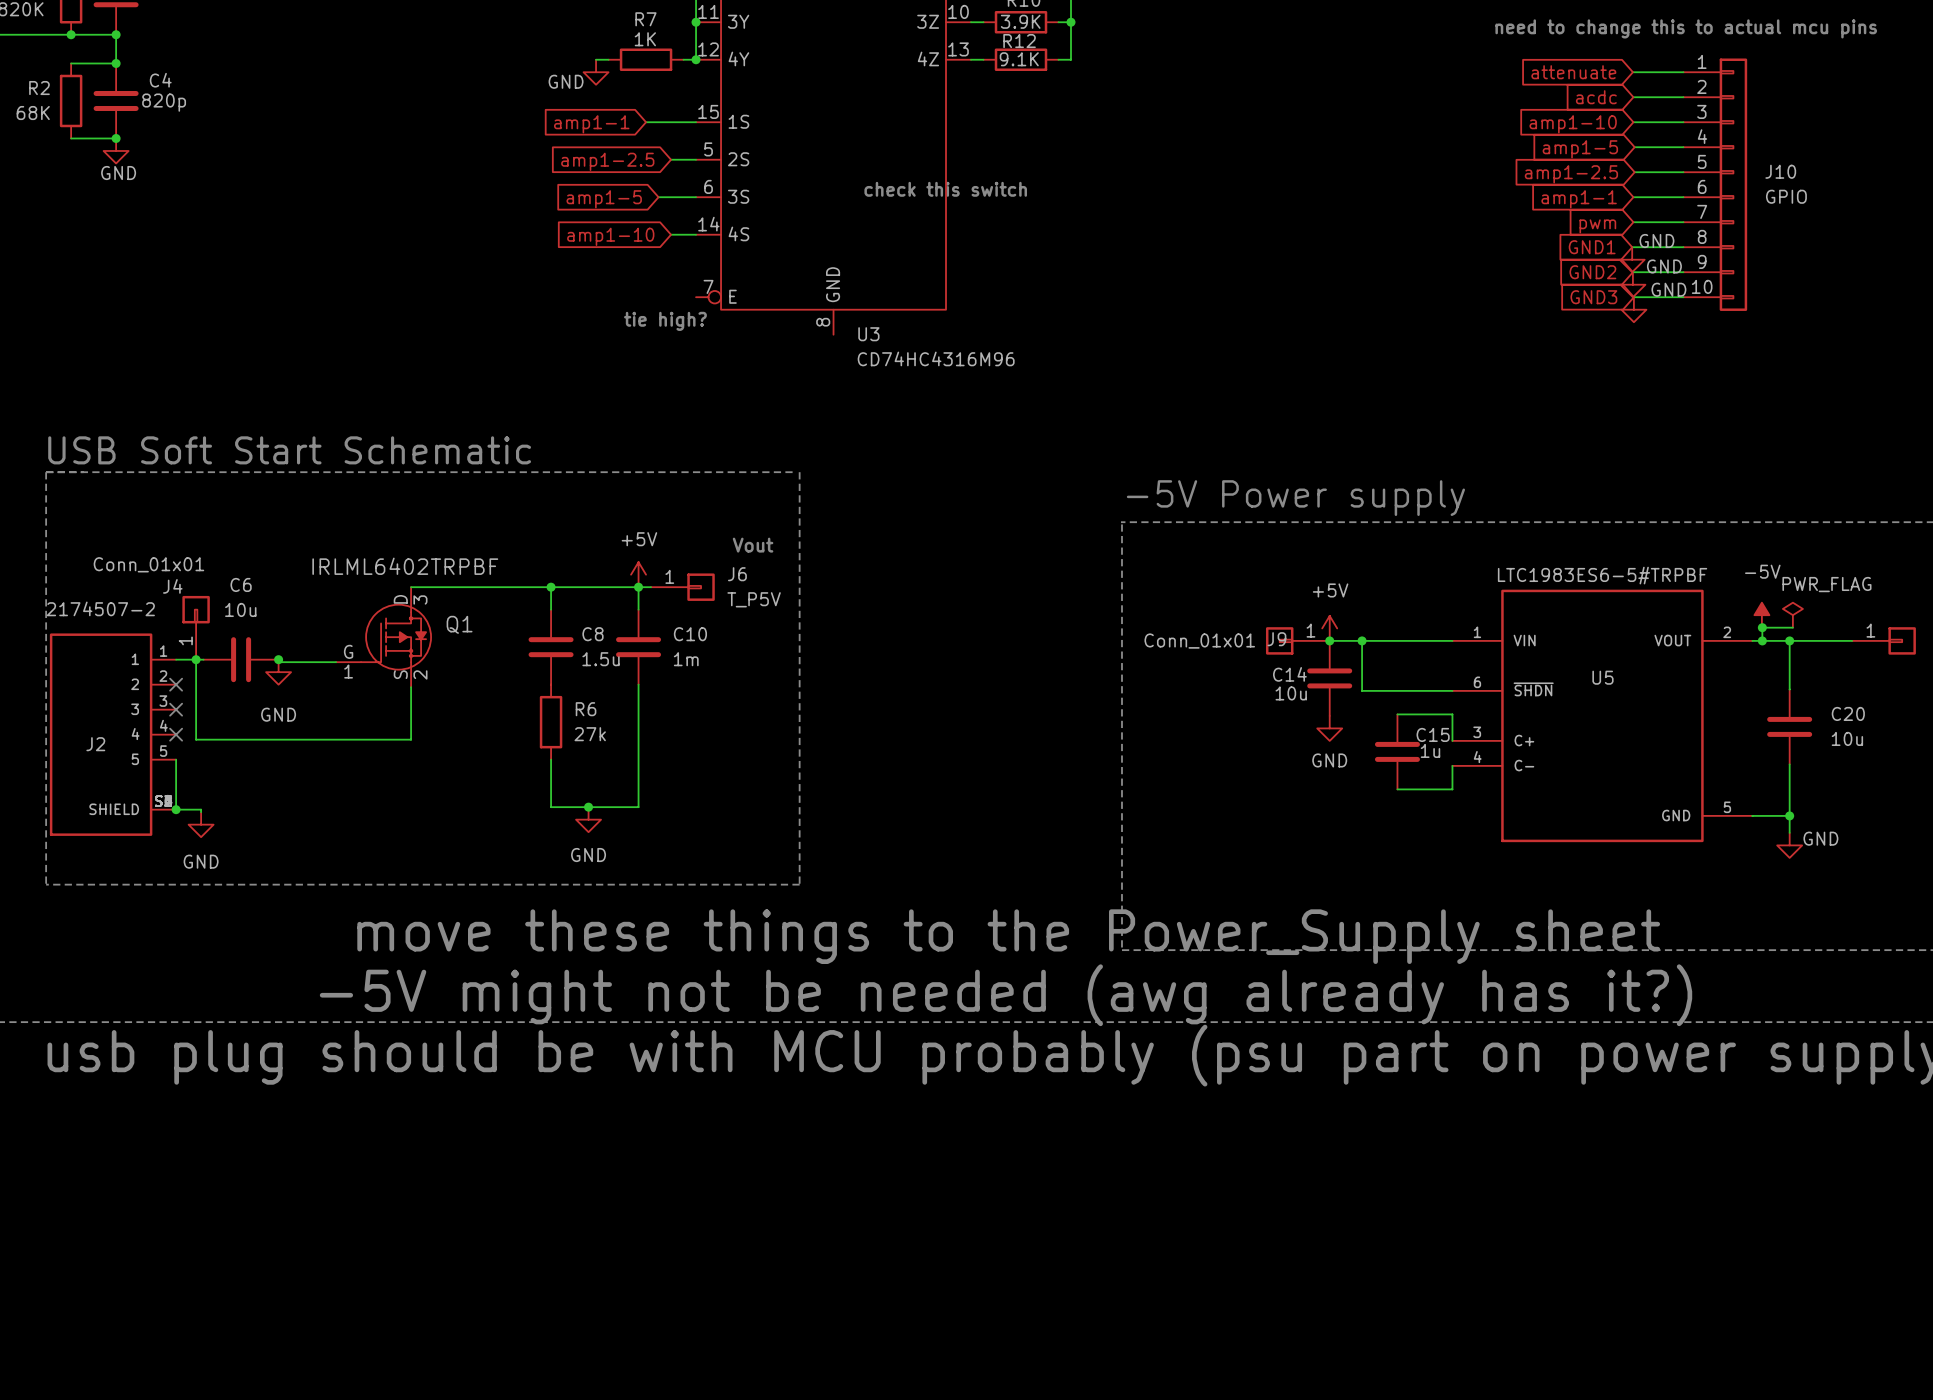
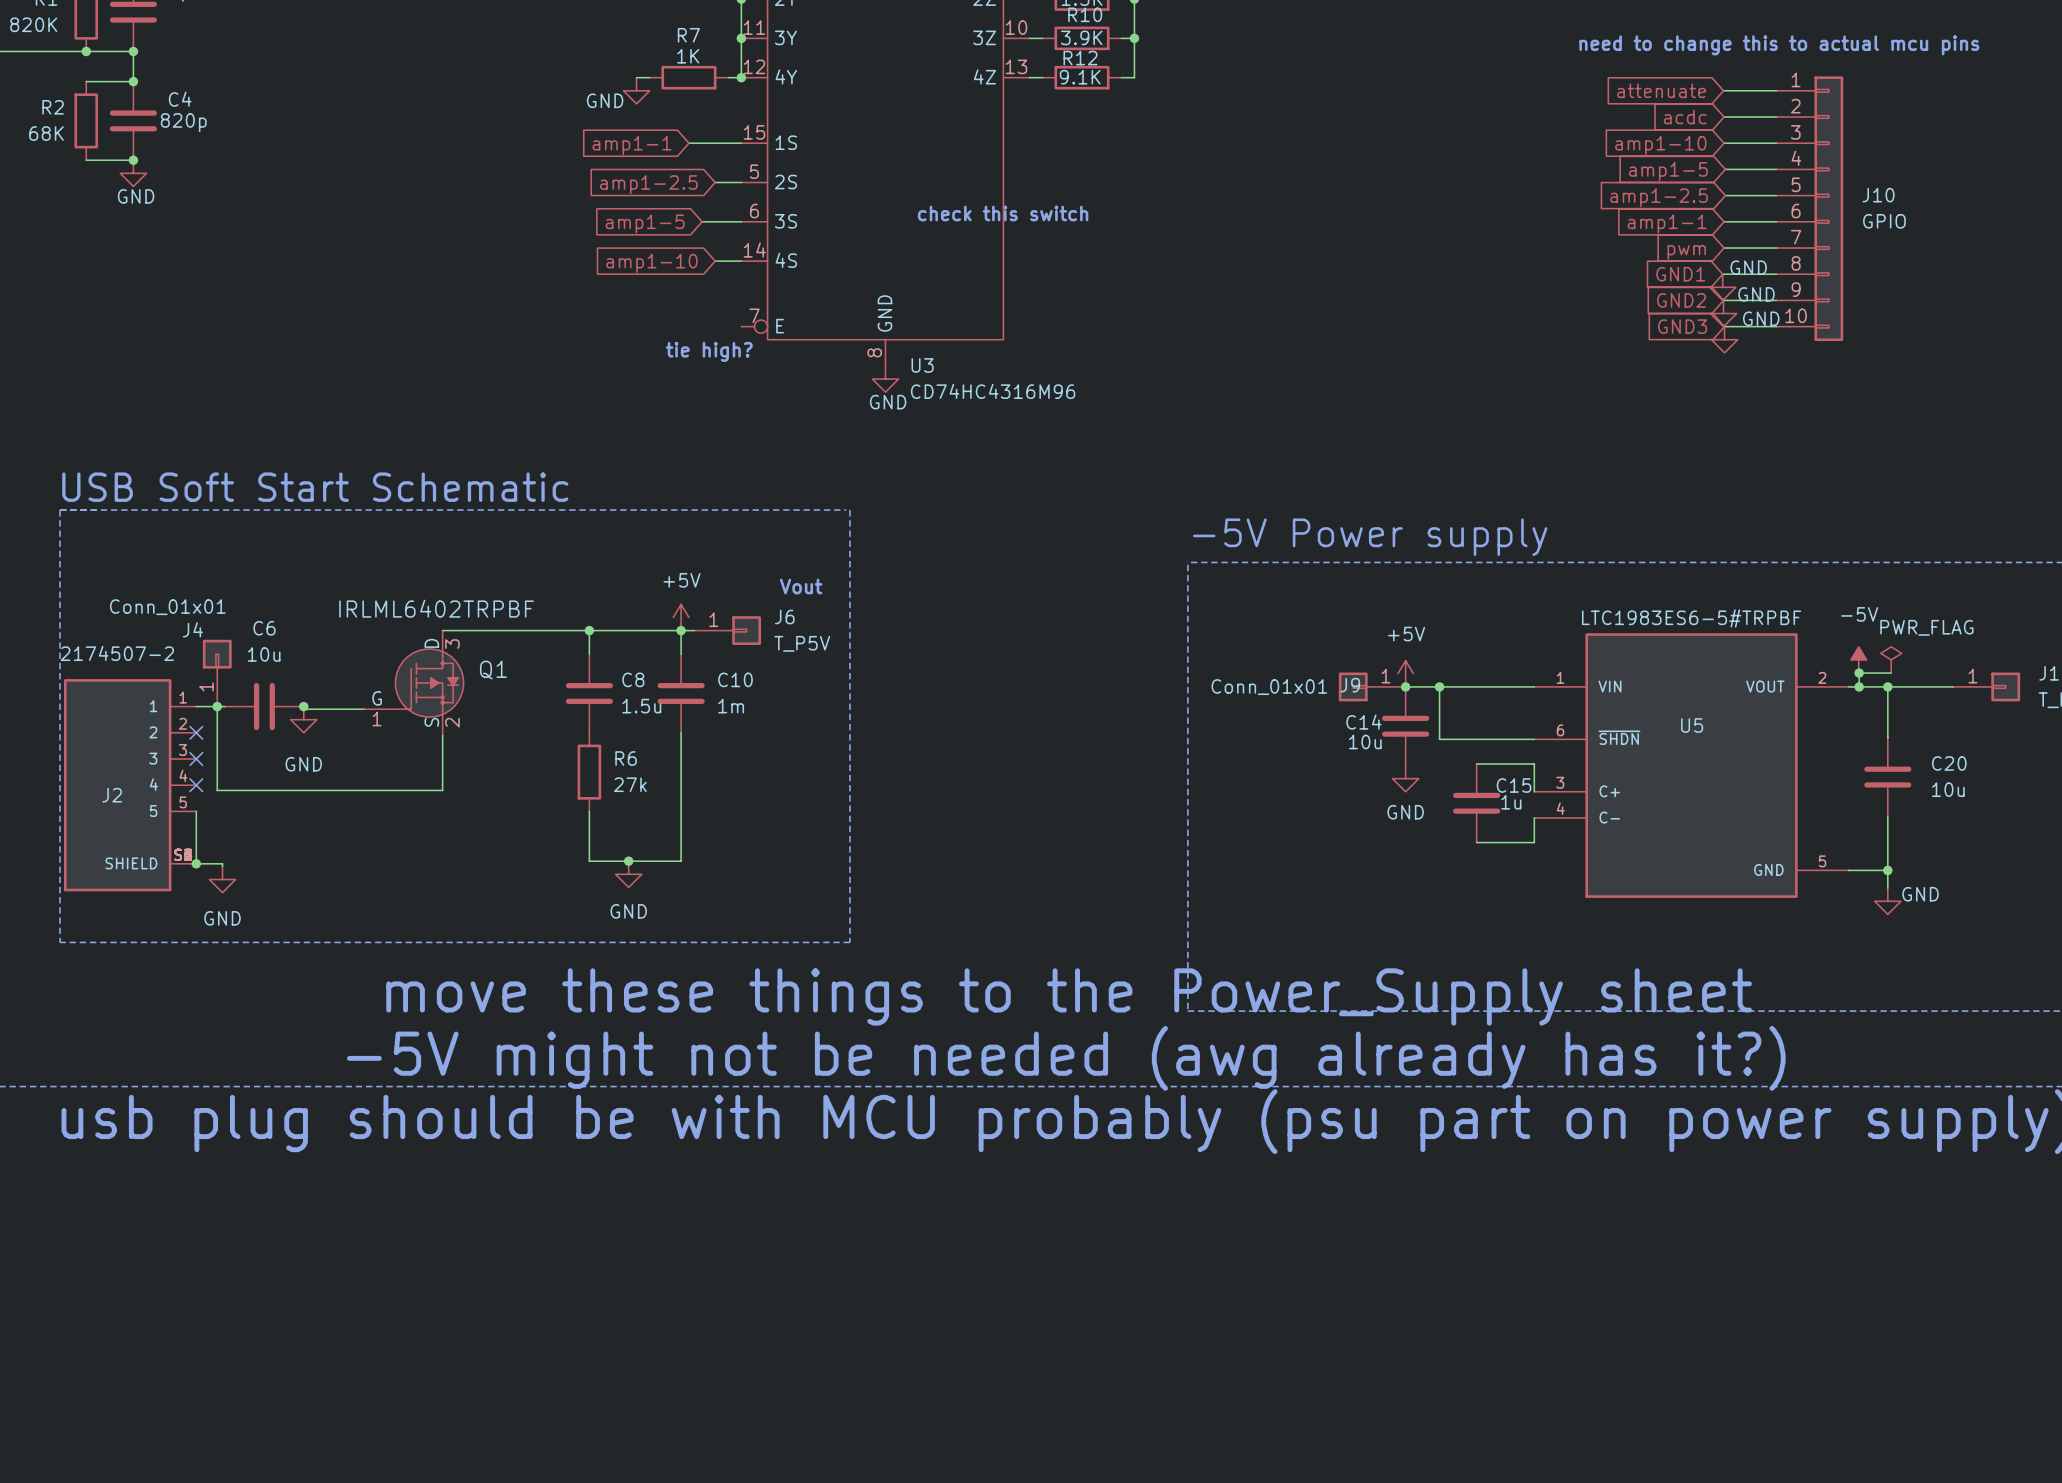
power symbol: none -> GND (885, 379)

